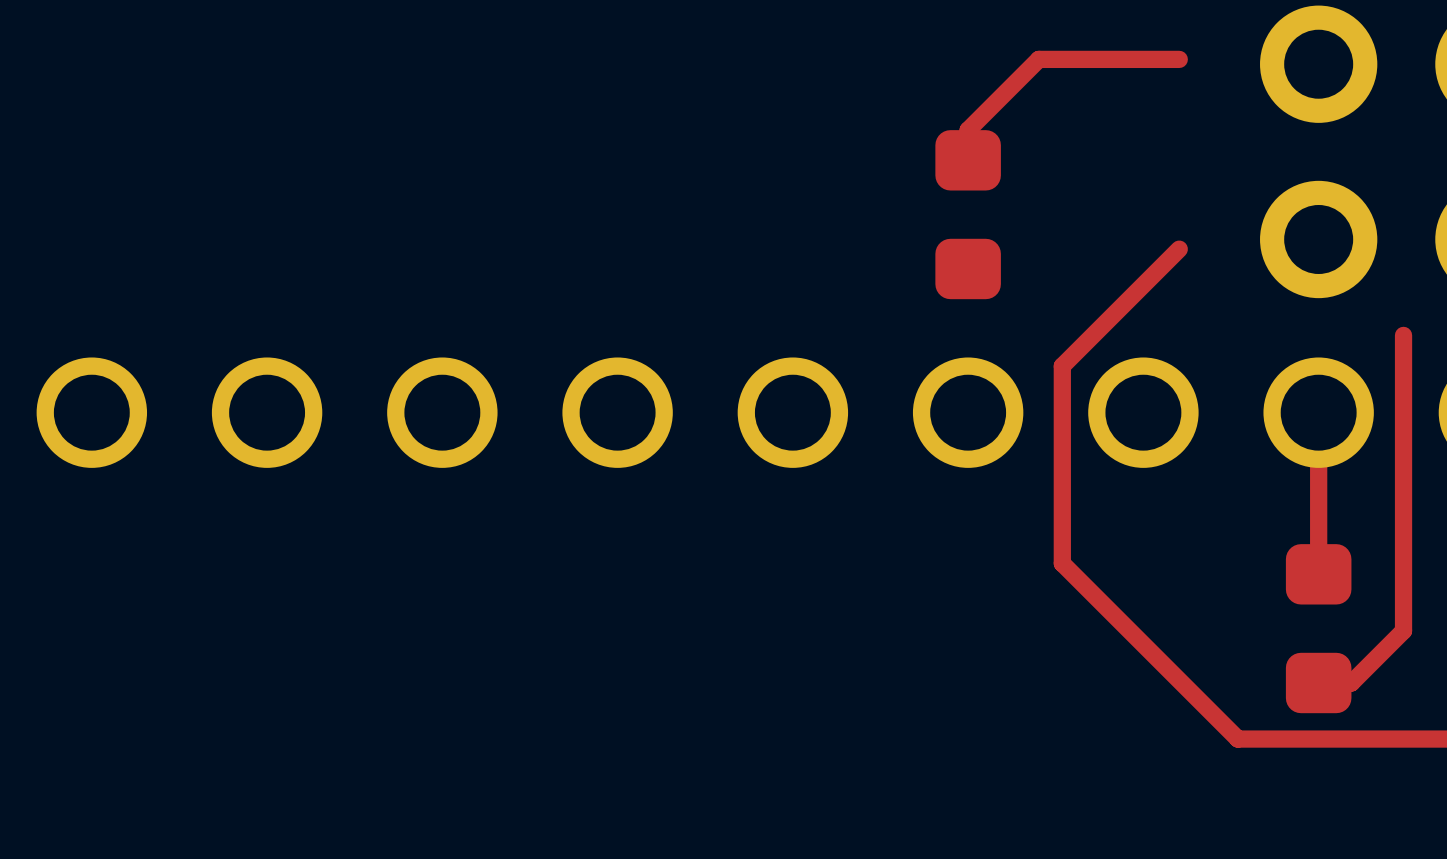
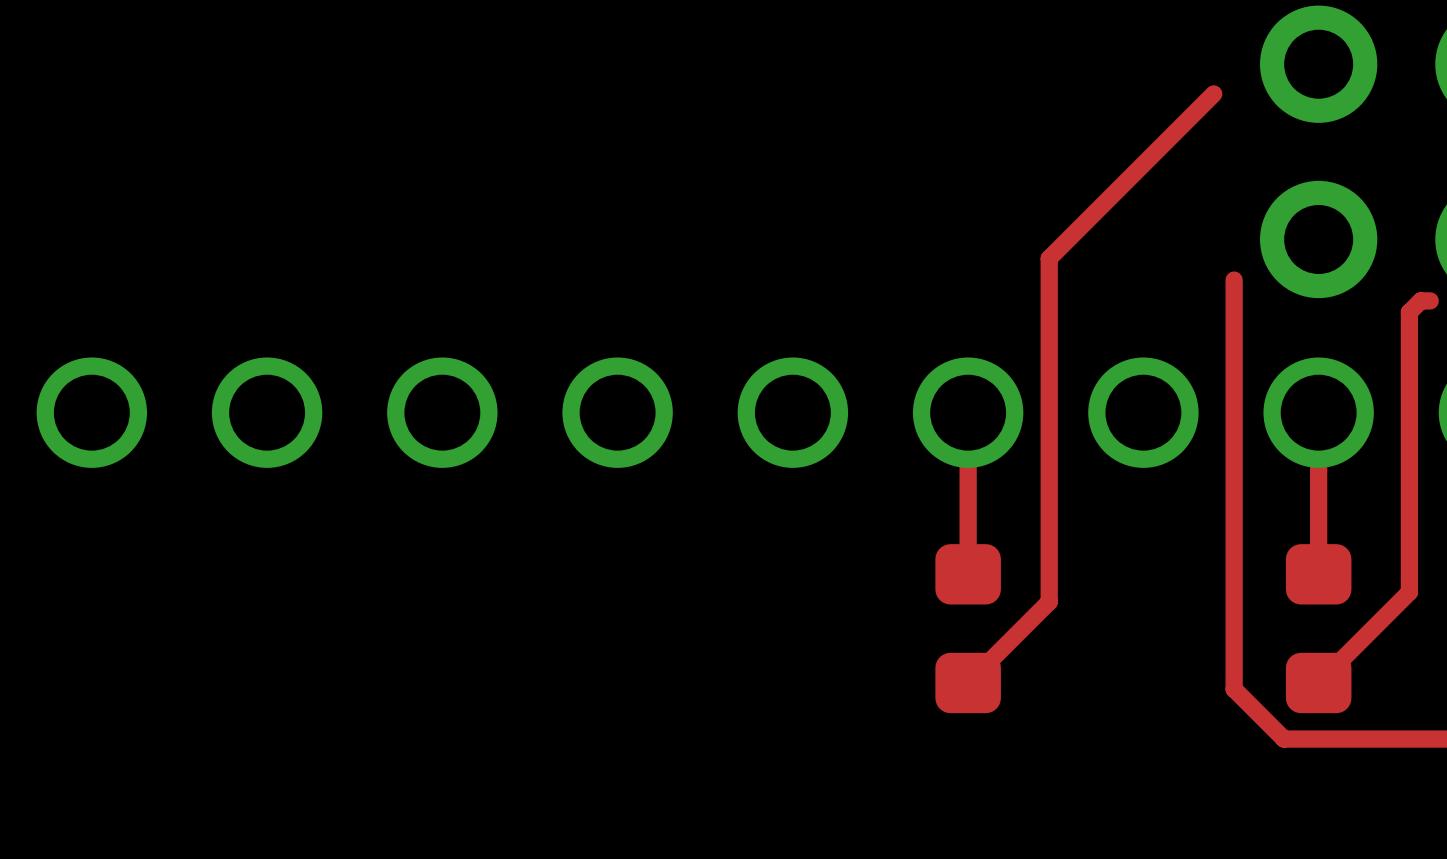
top track: (1179, 59) (1038, 59) (968, 130) (968, 160) -> none
top track: none -> (1213, 93) (1049, 258) (1049, 601) (968, 682)
part position: (968, 214) -> (968, 628)
top track: (1179, 249) (1062, 366) (1062, 563) (1237, 739) (1284, 739) -> (1234, 280) (1234, 689) (1284, 739)
top track: (1403, 335) (1403, 630) (1351, 682) (1318, 682) -> (1430, 300) (1420, 300) (1409, 312) (1409, 592) (1318, 682)
top track: none -> (968, 412) (968, 574)

